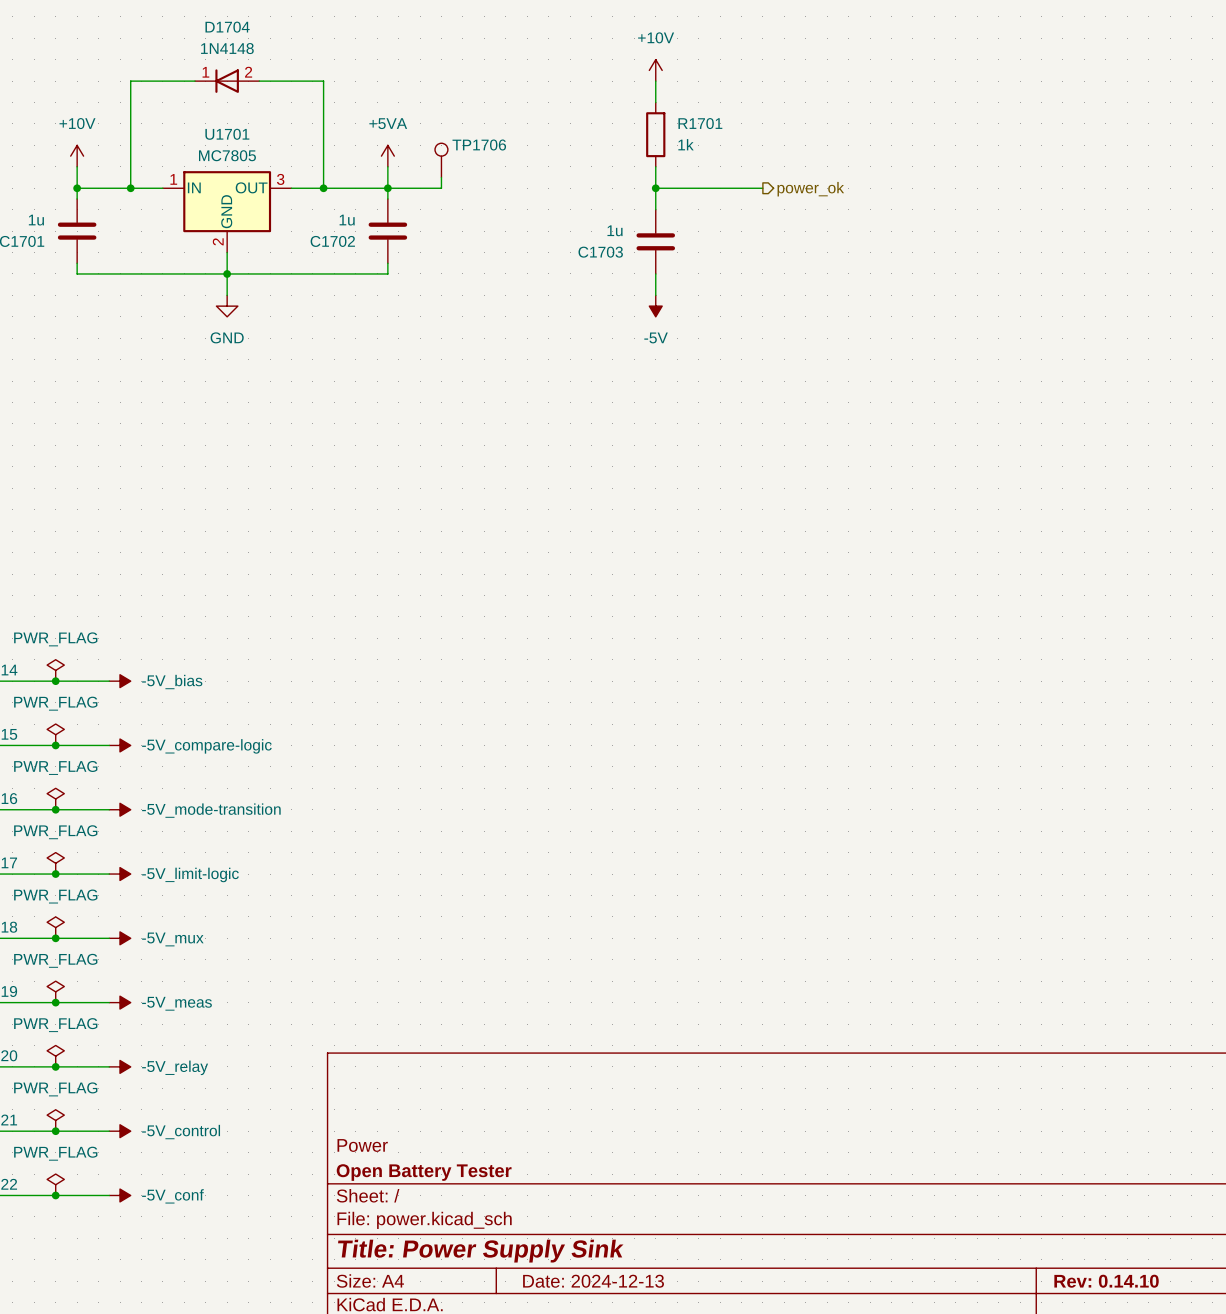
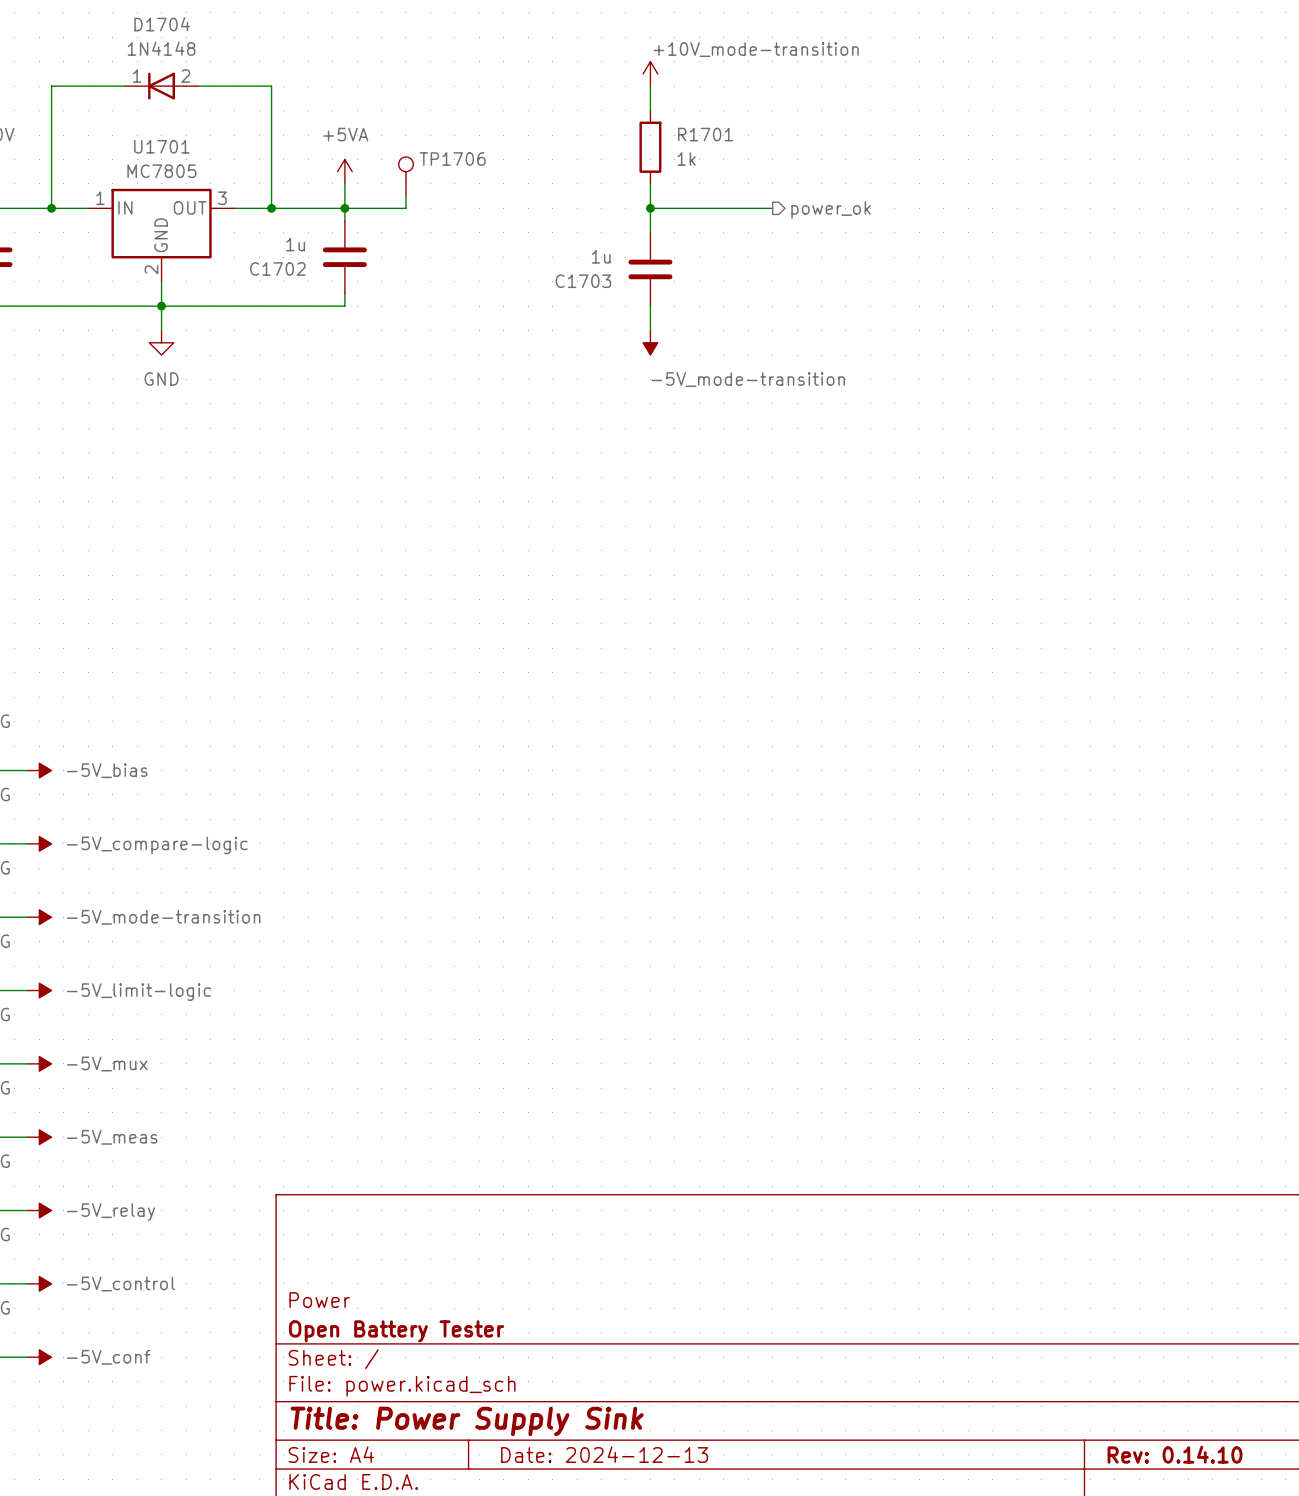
power symbol: +10V (655, 70) -> +10V_mode-transition (650, 73)
power symbol: -5V (655, 306) -> -5V_mode-transition (650, 342)

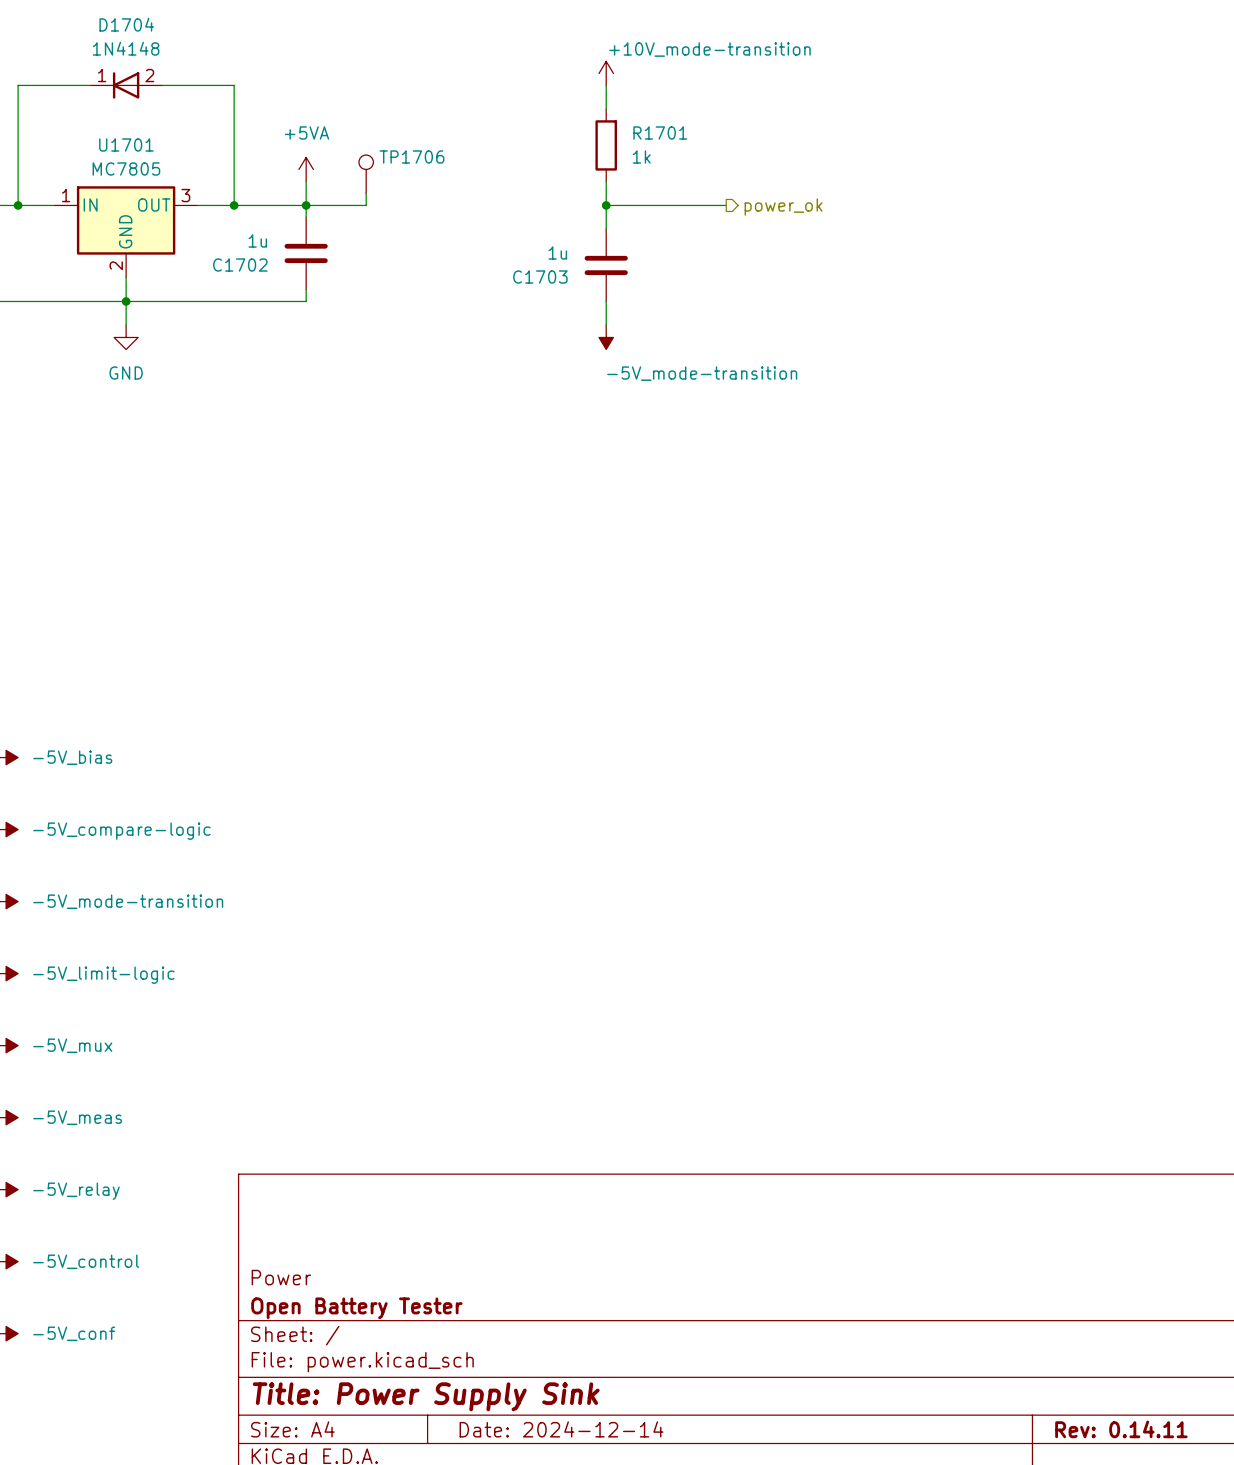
title block: Date: 2024-12-13 (604, 1454) -> Date: 2024-12-14 (561, 1429)
title block: Rev: 0.14.10 (1175, 1454) -> Rev: 0.14.11 (1121, 1429)

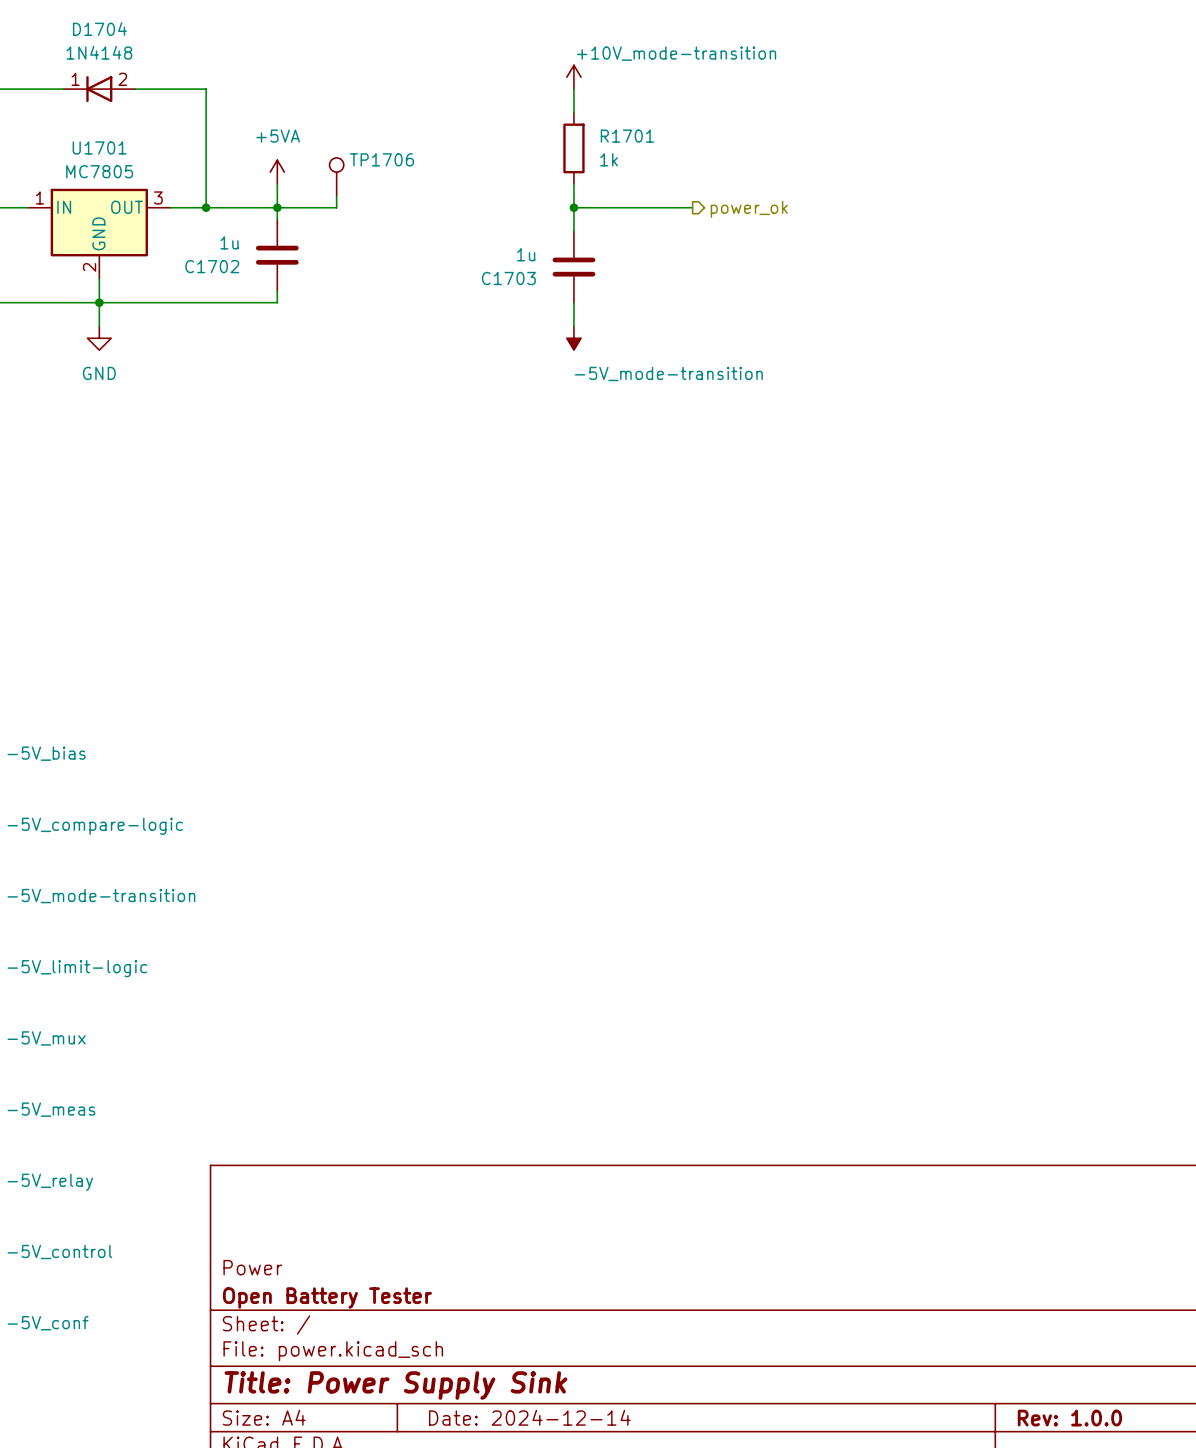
title block: Rev: 0.14.11 (1121, 1429) -> Rev: 1.0.0 (1069, 1418)

